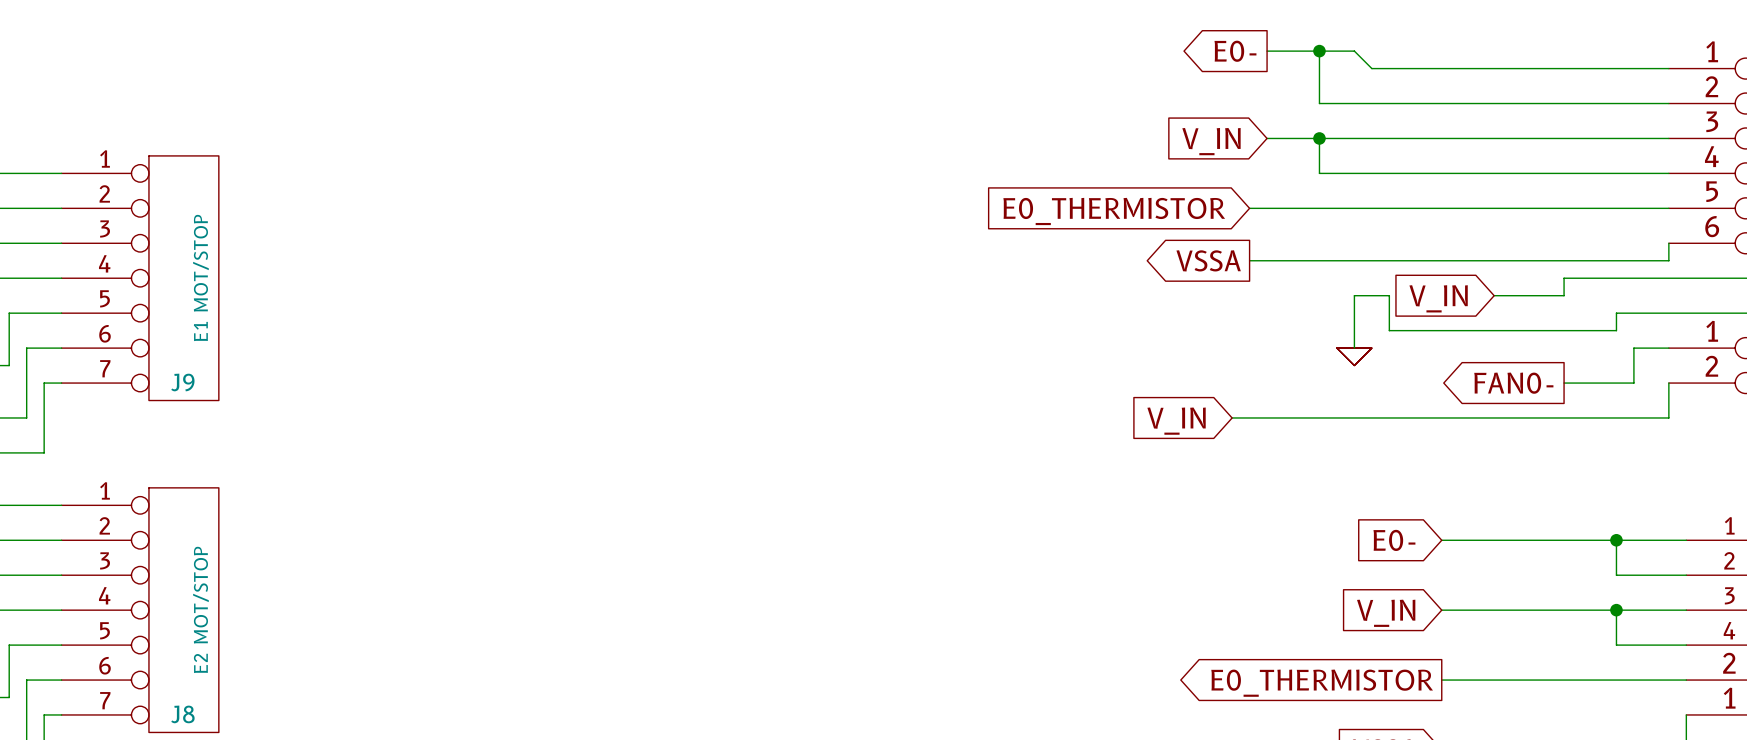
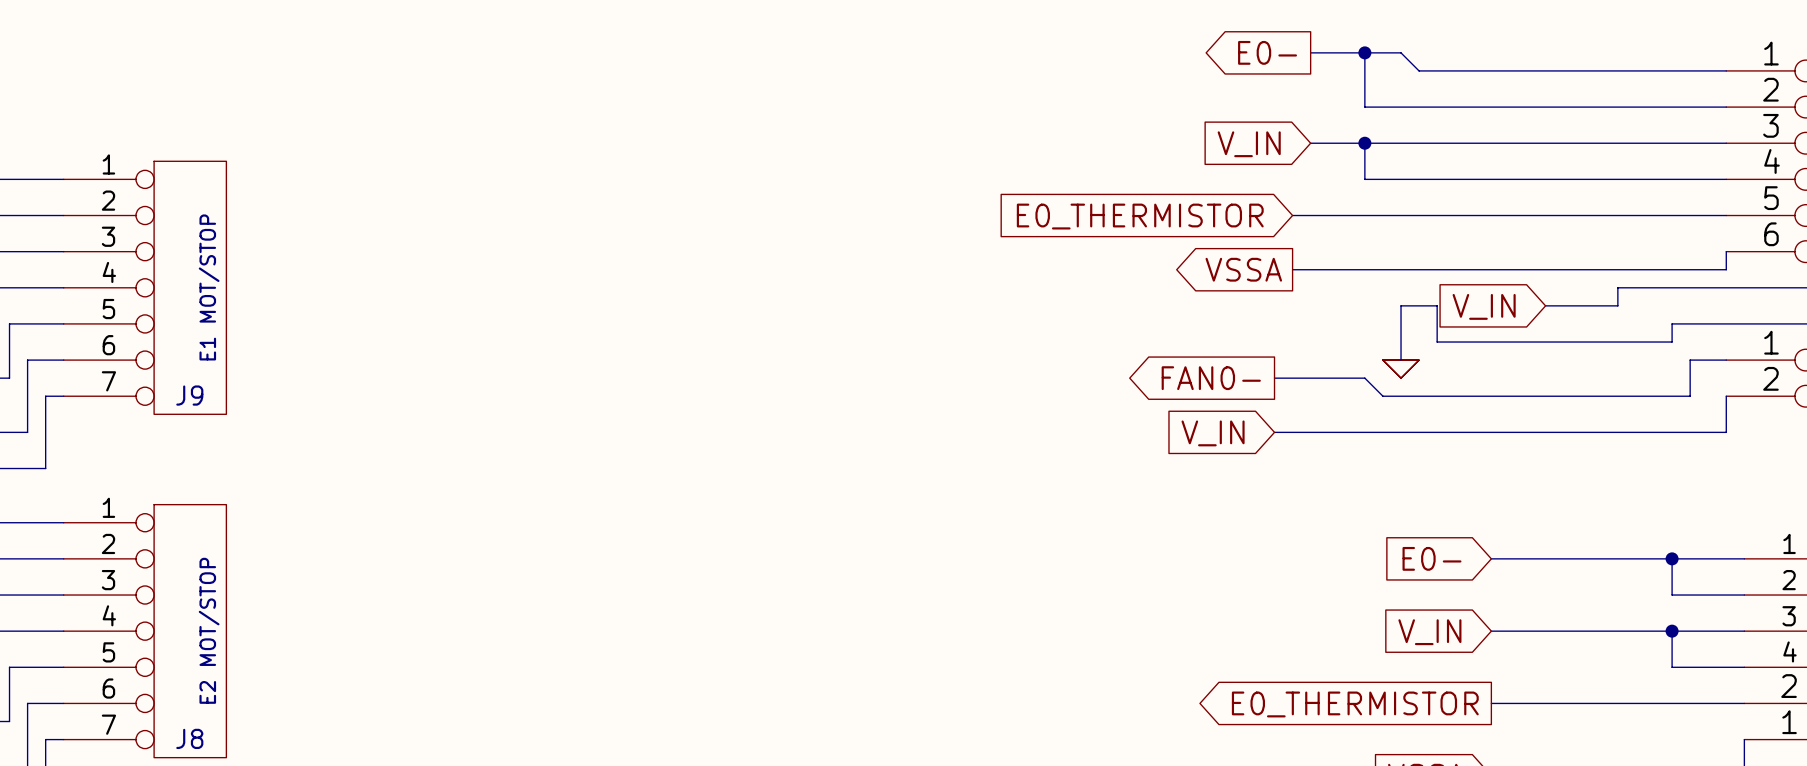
wire: none -> (1274, 378) (1364, 378) (1382, 396) (1617, 396)
global label position: FAN0- (1513, 383) -> FAN0- (1211, 378)

